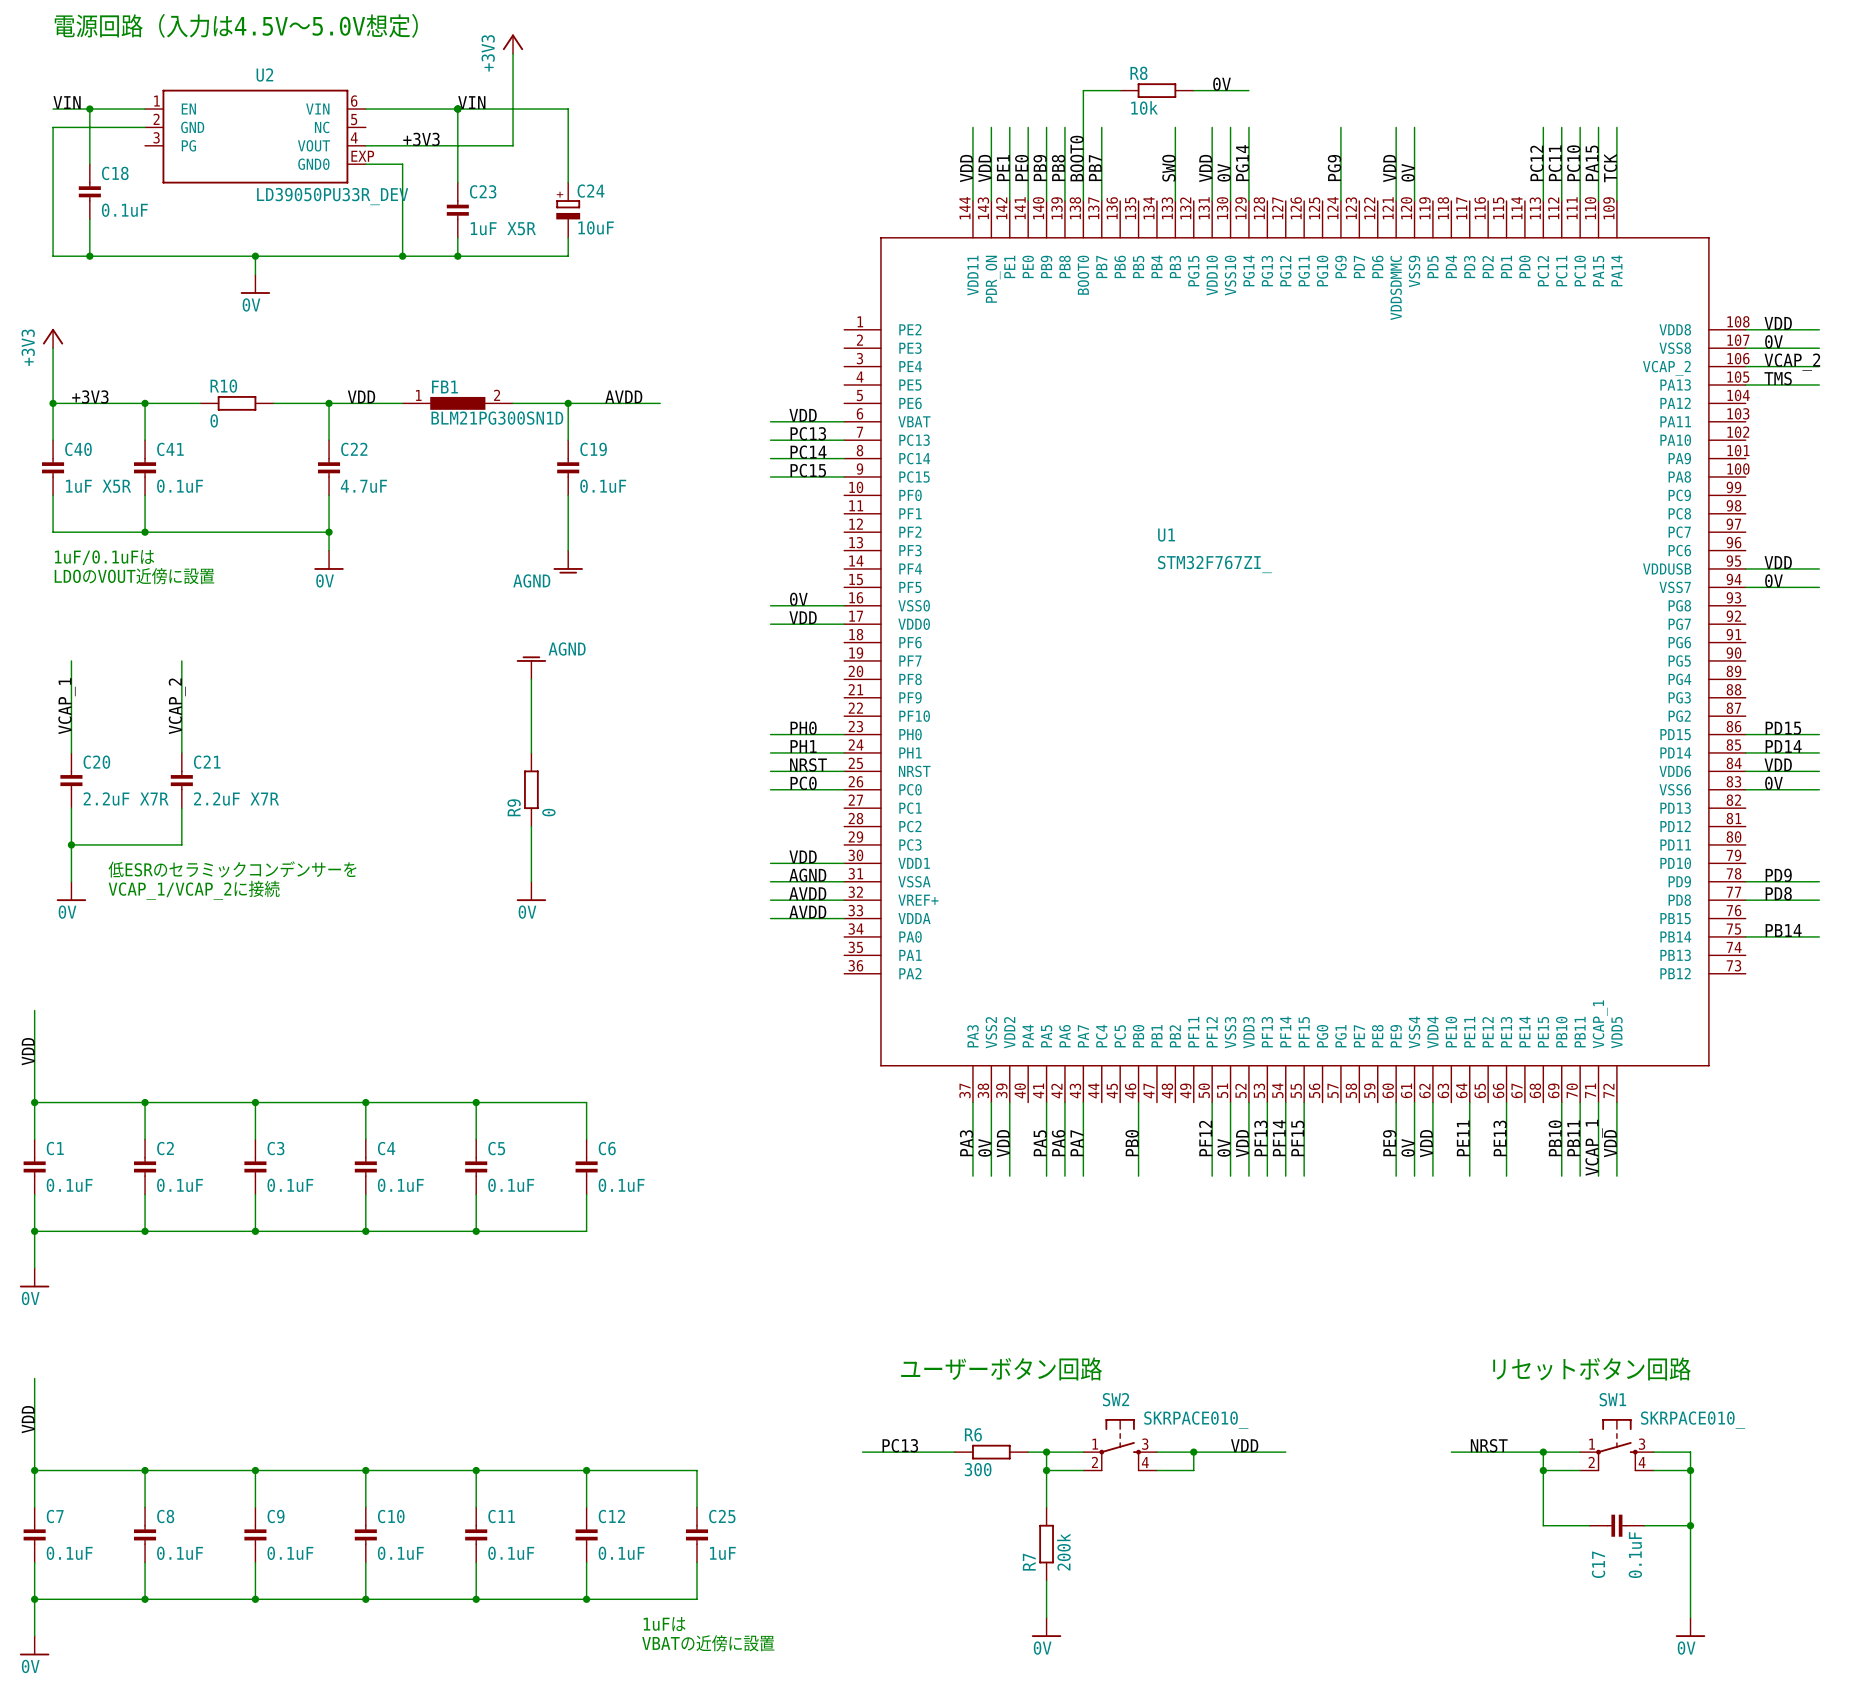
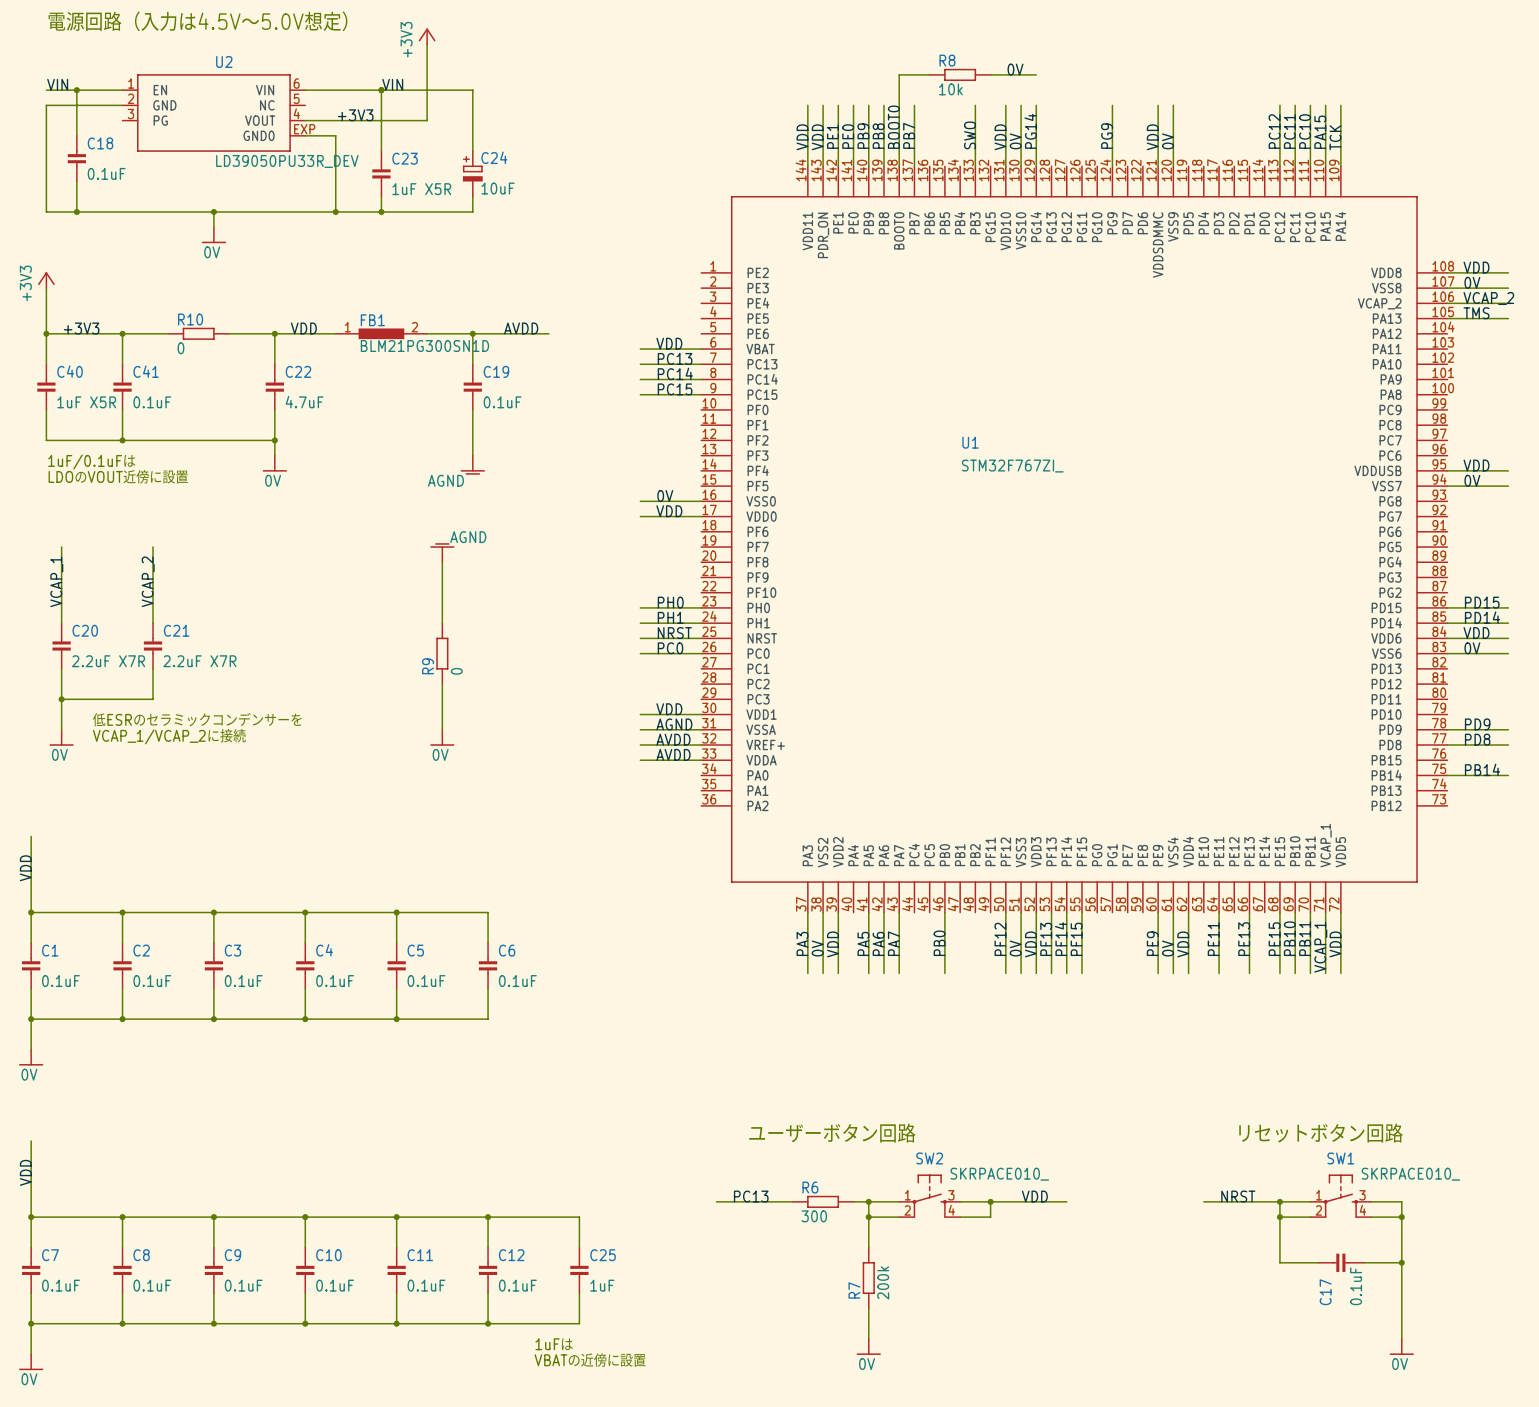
wire: none -> (1279, 912) (1279, 973)
label: none -> PE15 (1274, 939)

